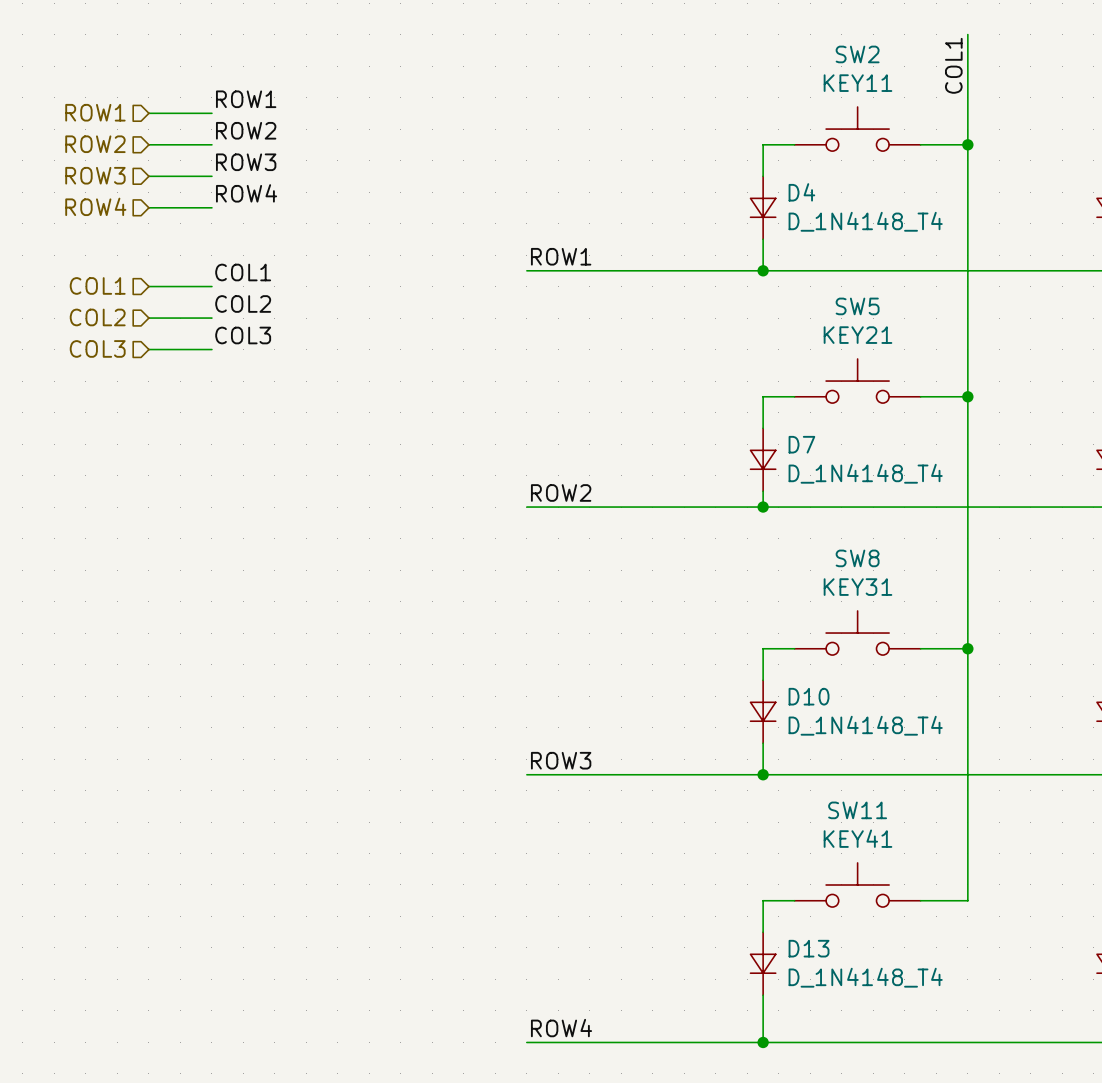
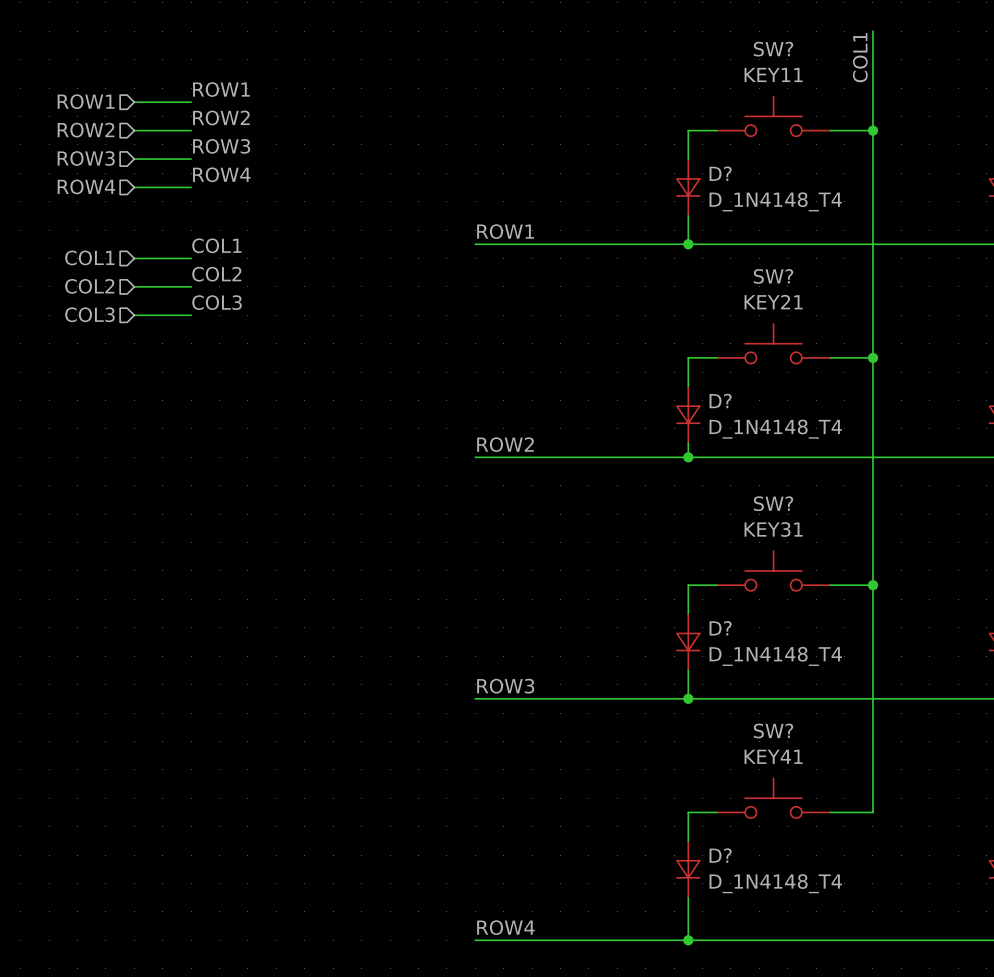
SW2 name: SW2 (857, 54) -> SW? (773, 49)
D4 name: D4 (801, 192) -> D? (720, 173)
SW5 name: SW5 (857, 306) -> SW? (773, 276)
D7 name: D7 (801, 444) -> D? (720, 400)
SW8 name: SW8 (857, 558) -> SW? (773, 503)
D10 name: D10 (809, 696) -> D? (720, 628)
SW11 name: SW11 (857, 810) -> SW? (773, 730)
D13 name: D13 (809, 948) -> D? (720, 855)

